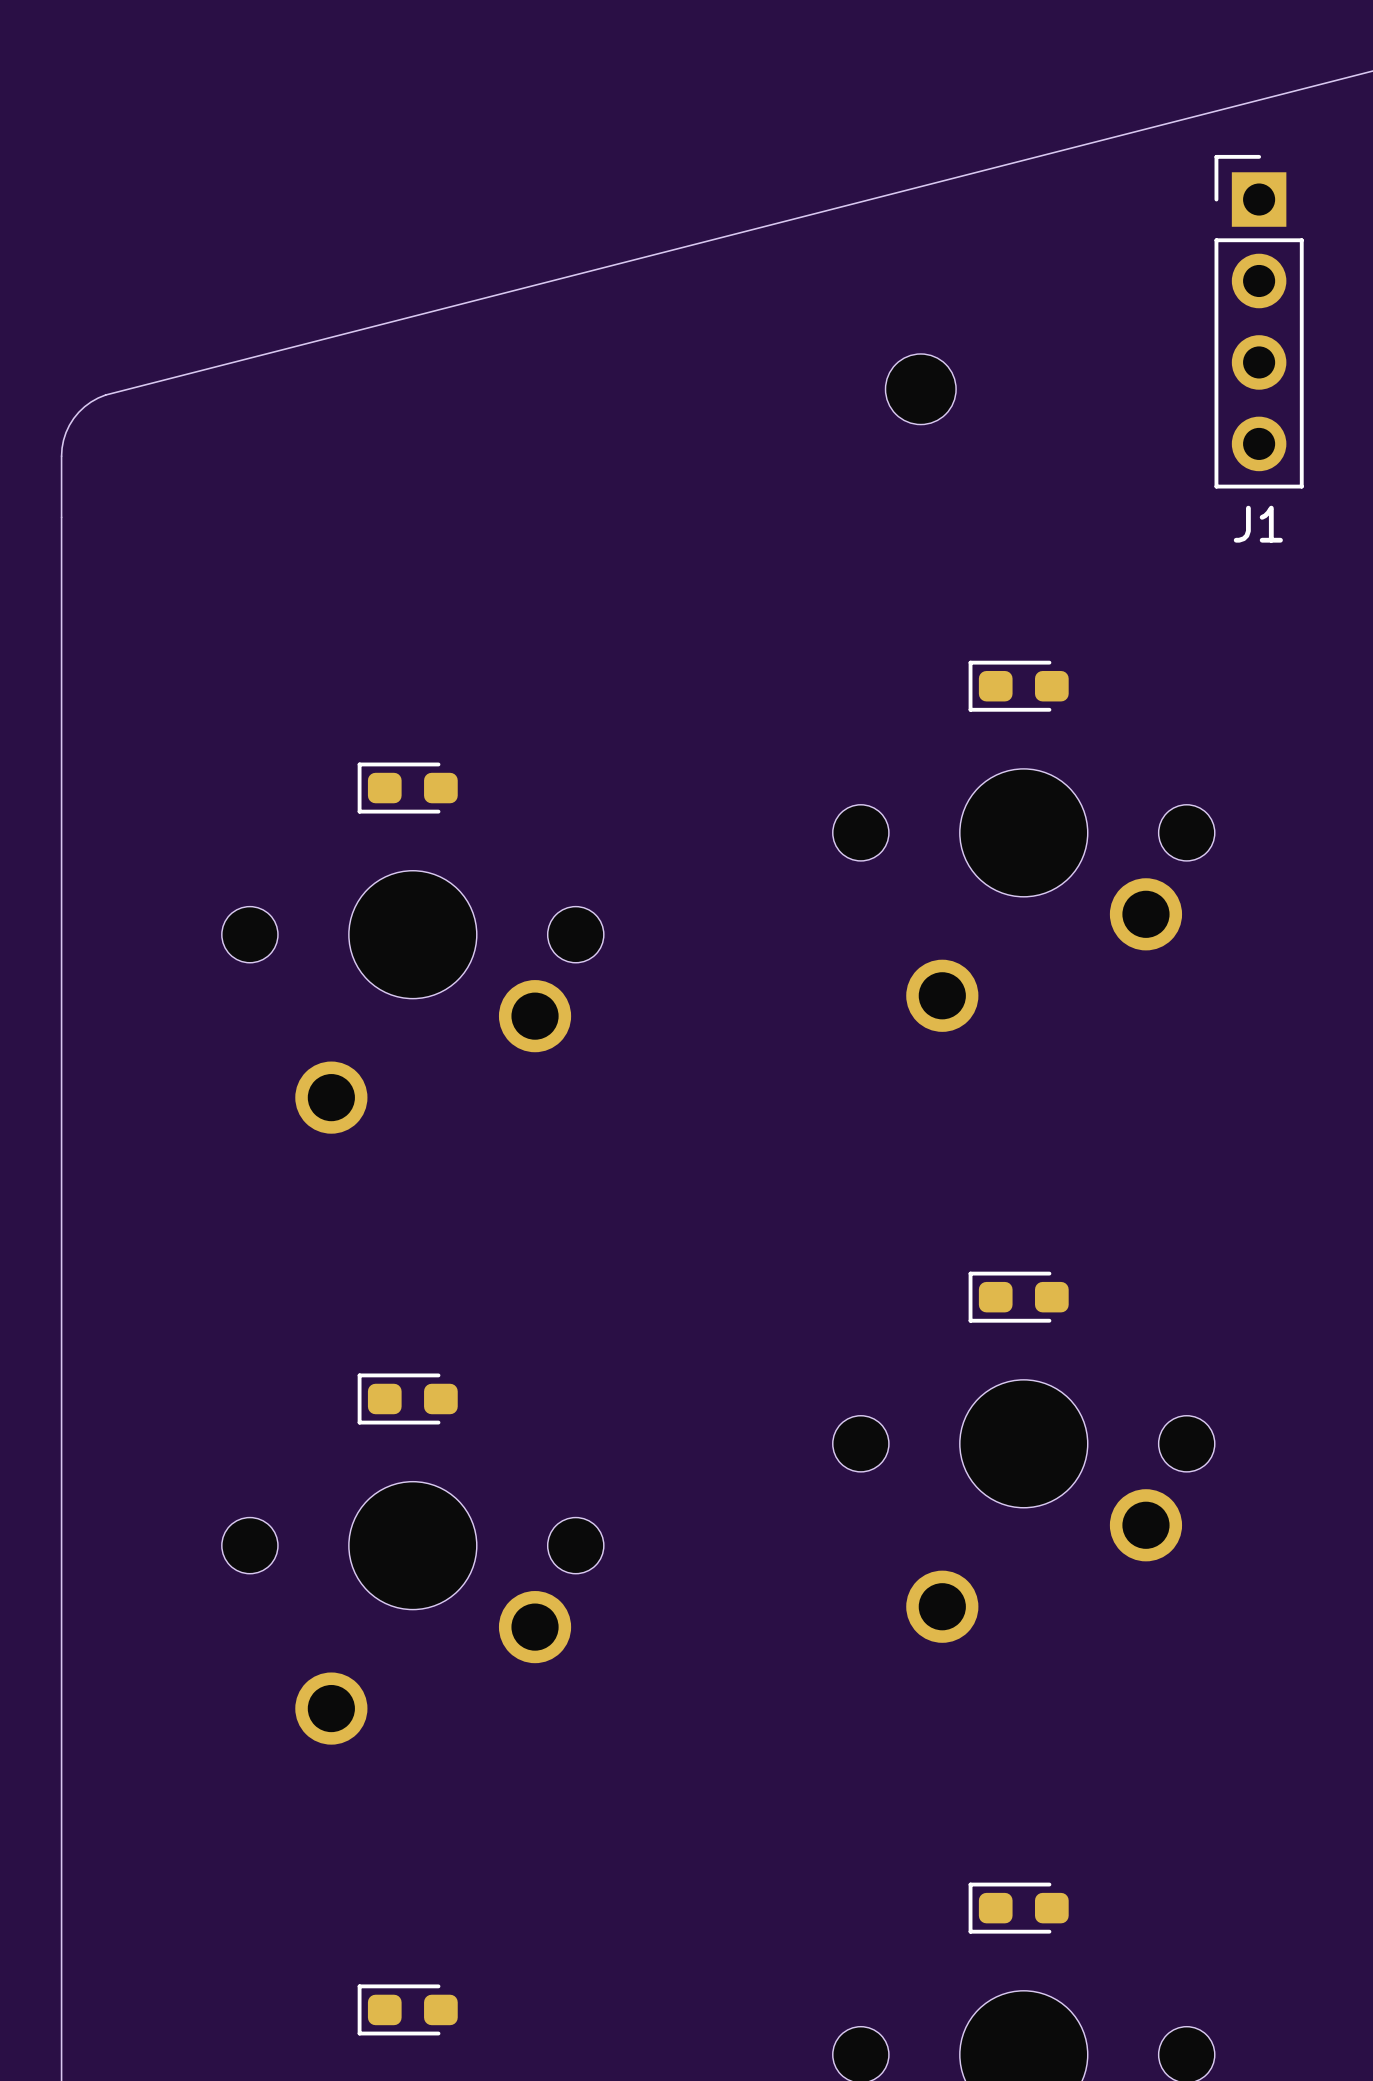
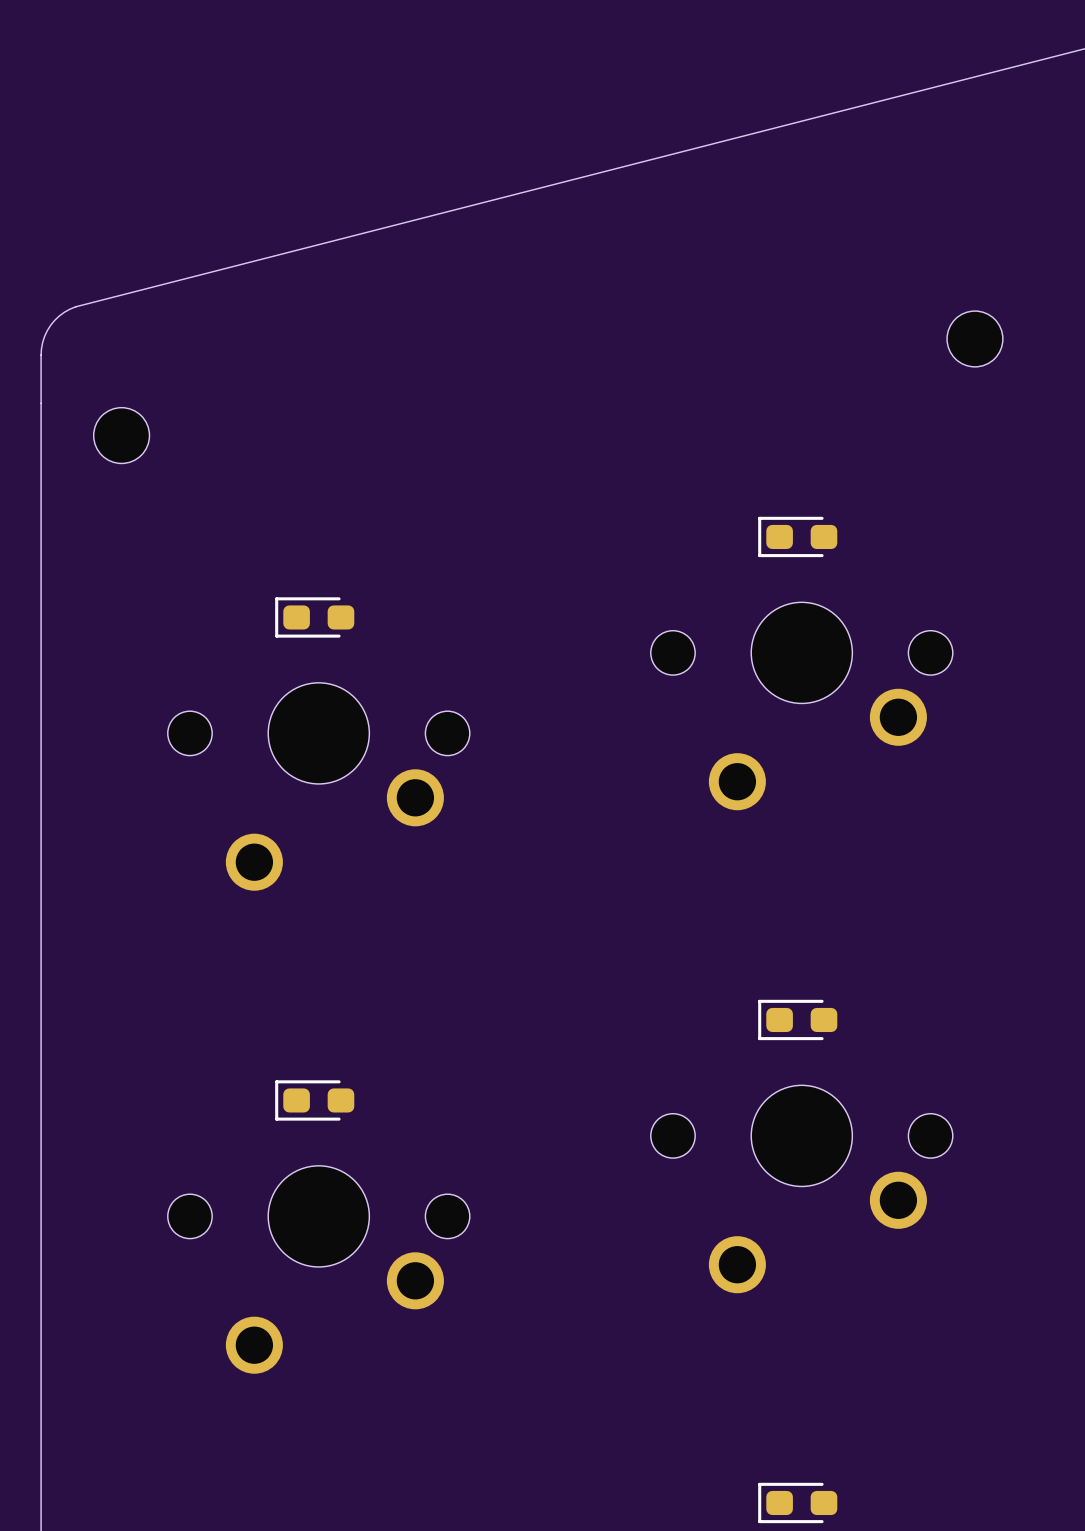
J1: (1259, 321) -> none
part position: (920, 389) -> (974, 338)
part: none -> (121, 435)

